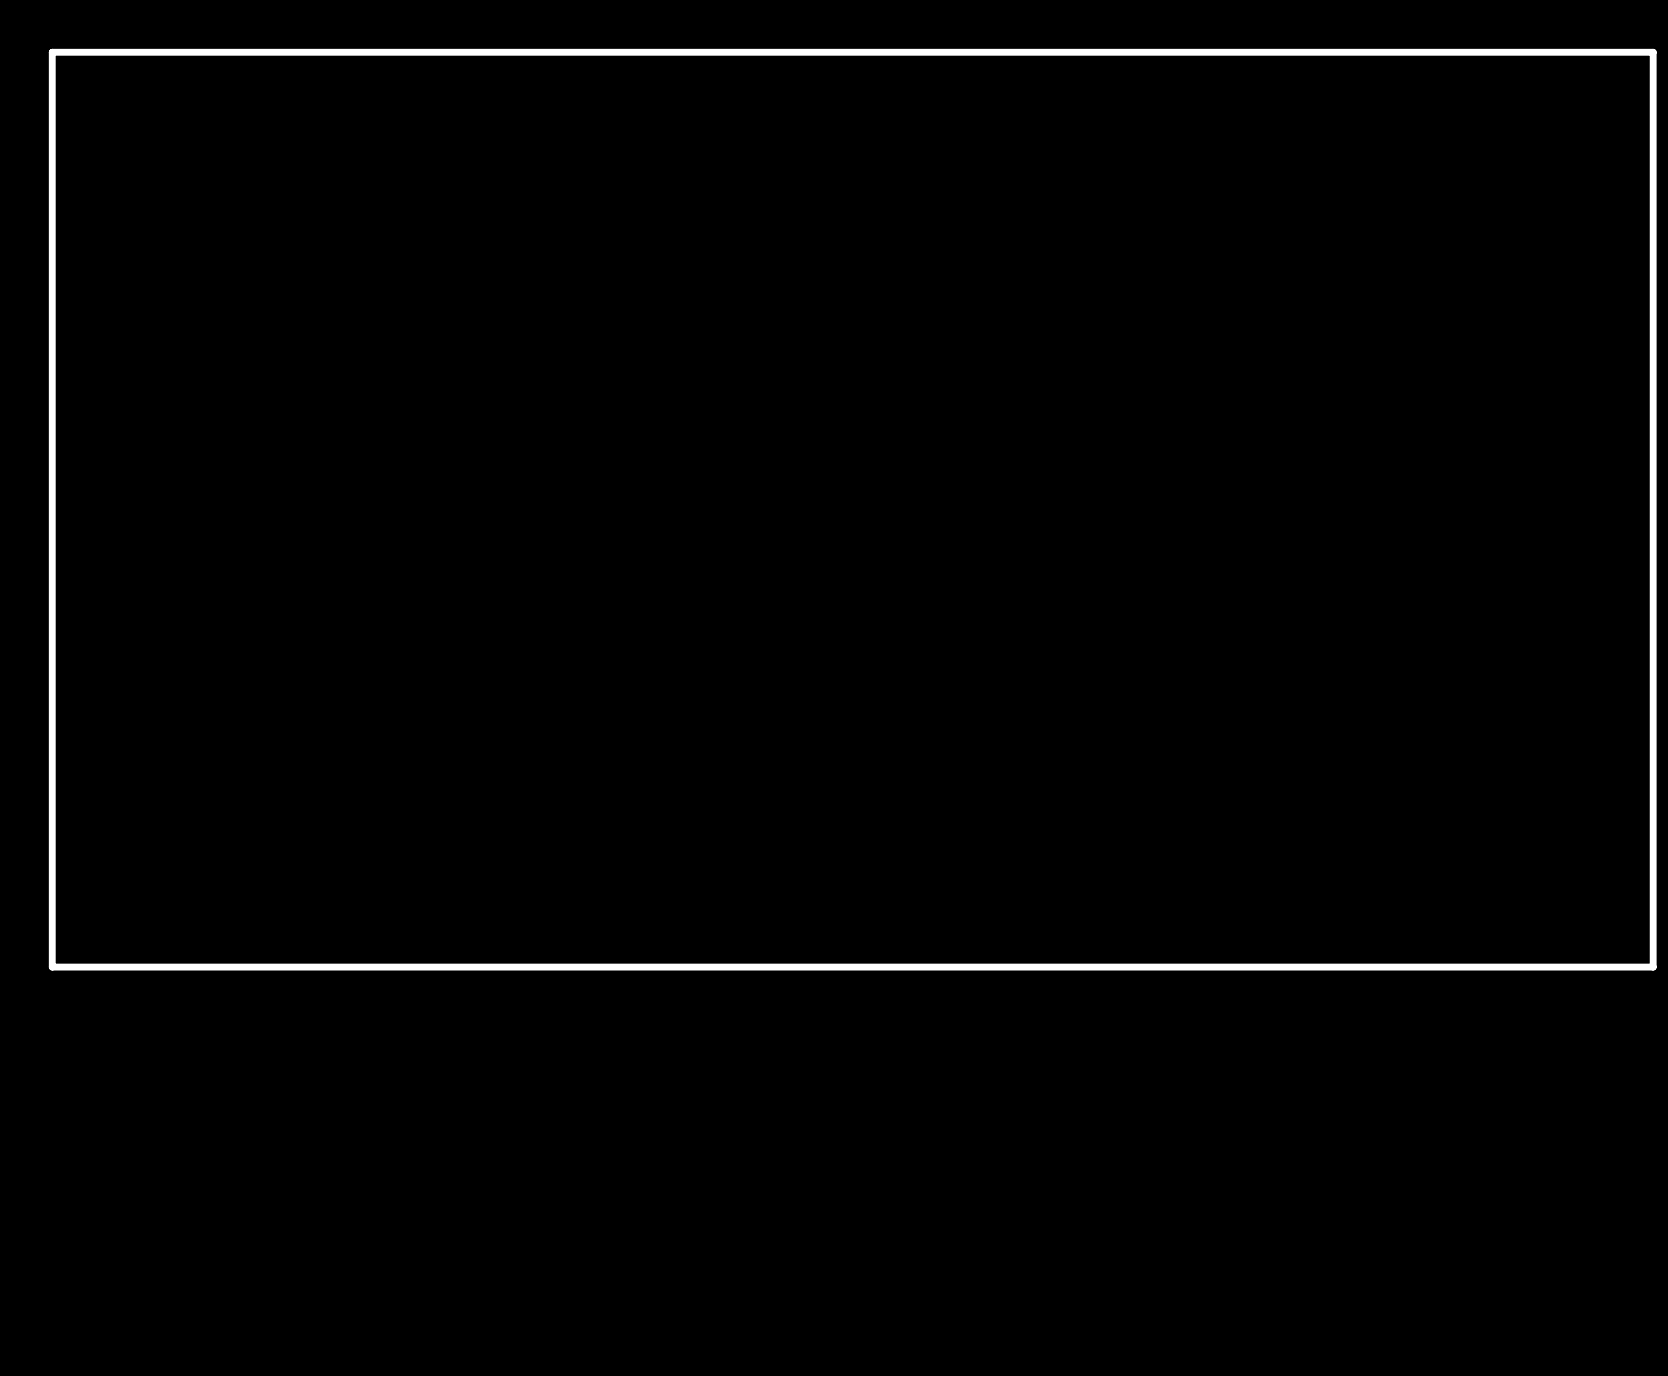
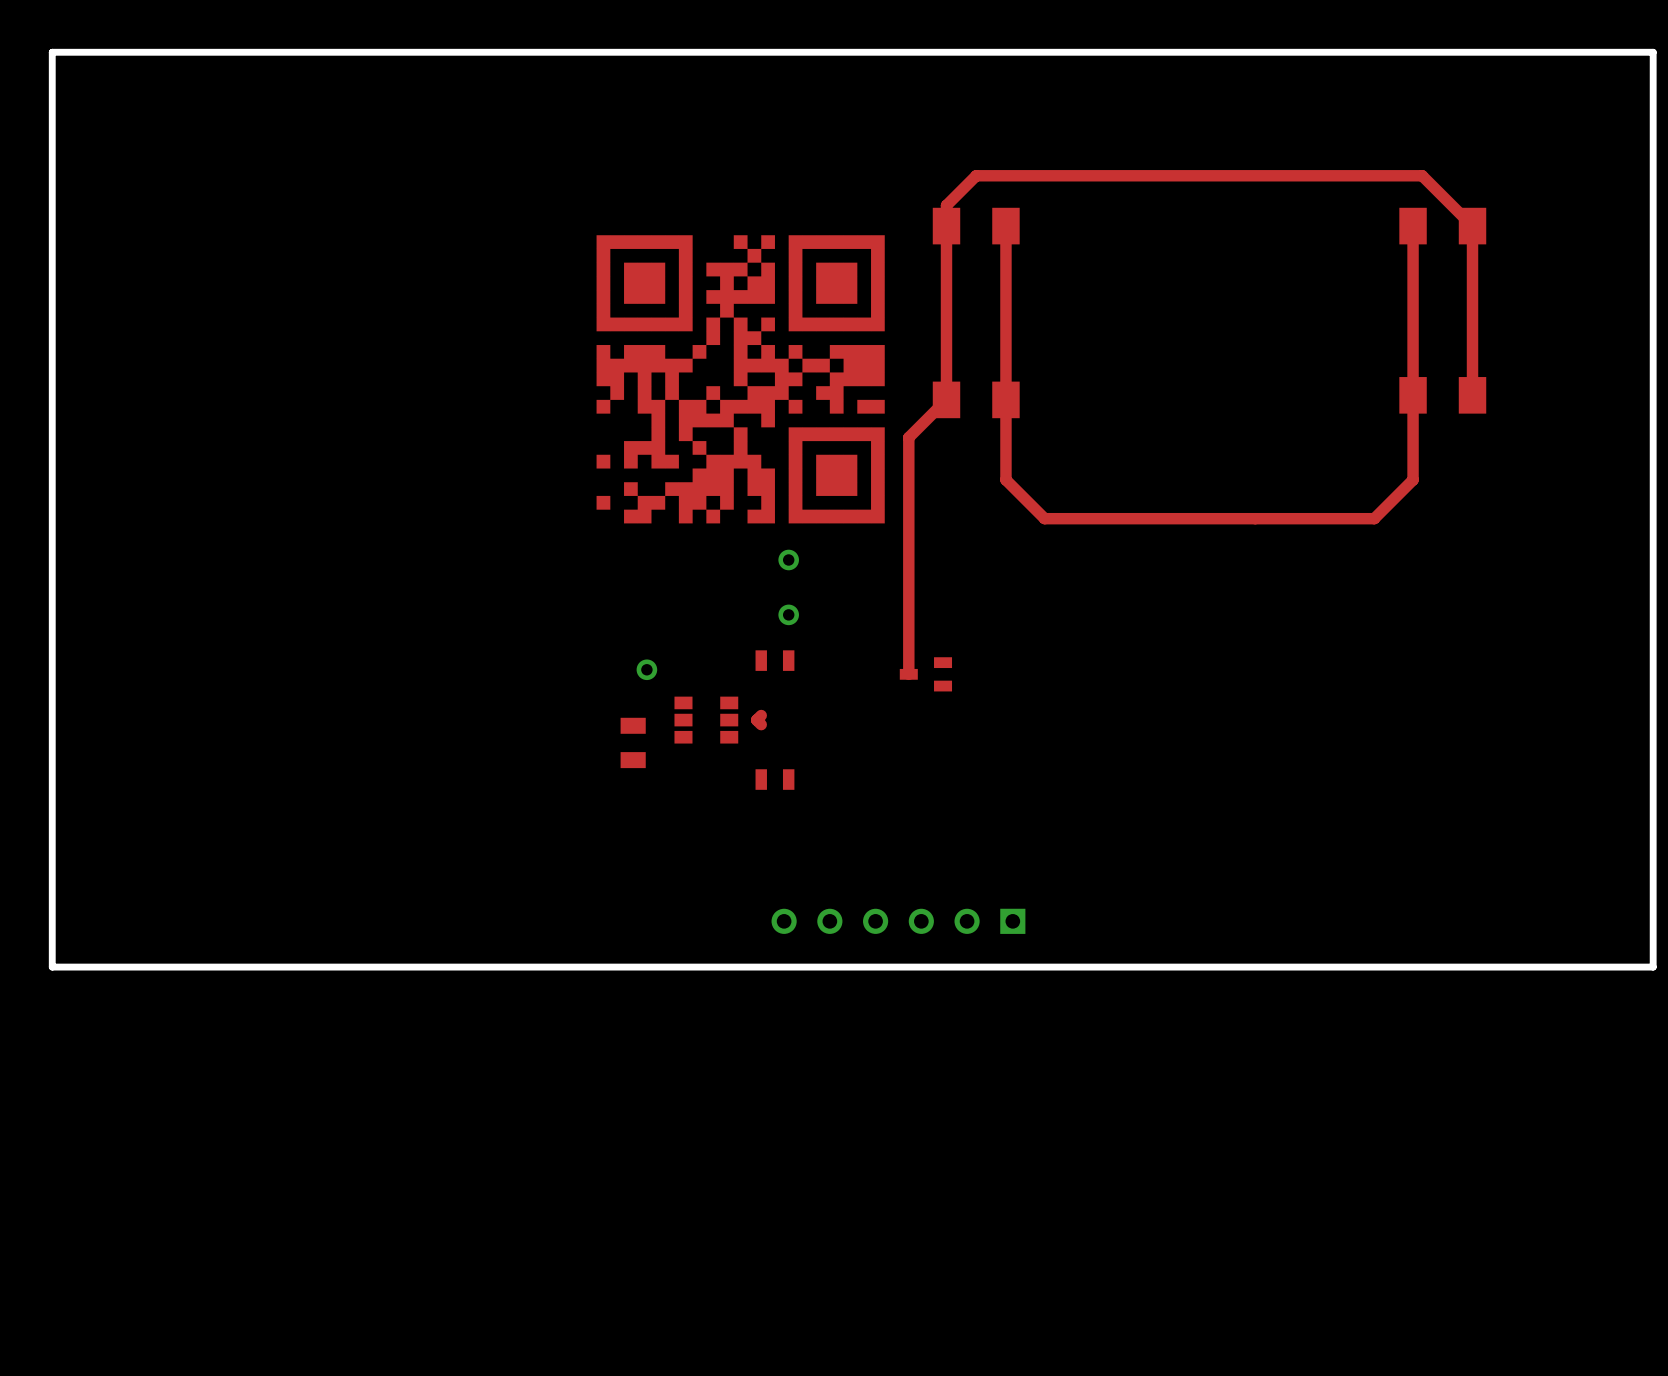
part: none -> (976, 226)
top track: none -> (1413, 226) (1413, 479) (1374, 518) (1044, 518) (1005, 479) (1005, 226)
part: none -> (1442, 226)
drawing: none -> [596, 235, 885, 524]
part: none -> (1442, 395)
top track: none -> (1472, 395) (1472, 226) (1422, 175) (976, 175) (946, 205) (946, 399) (908, 437) (908, 674)
part: none -> (976, 399)
part: none -> (788, 559)
part: none -> (788, 614)
part: none -> (774, 660)
part: none -> (646, 669)
part: none -> (925, 674)
top track: none -> (761, 715) (756, 720) (761, 724)
part: none -> (706, 720)
part: none -> (633, 742)
part: none -> (774, 779)
part: none -> (898, 921)

